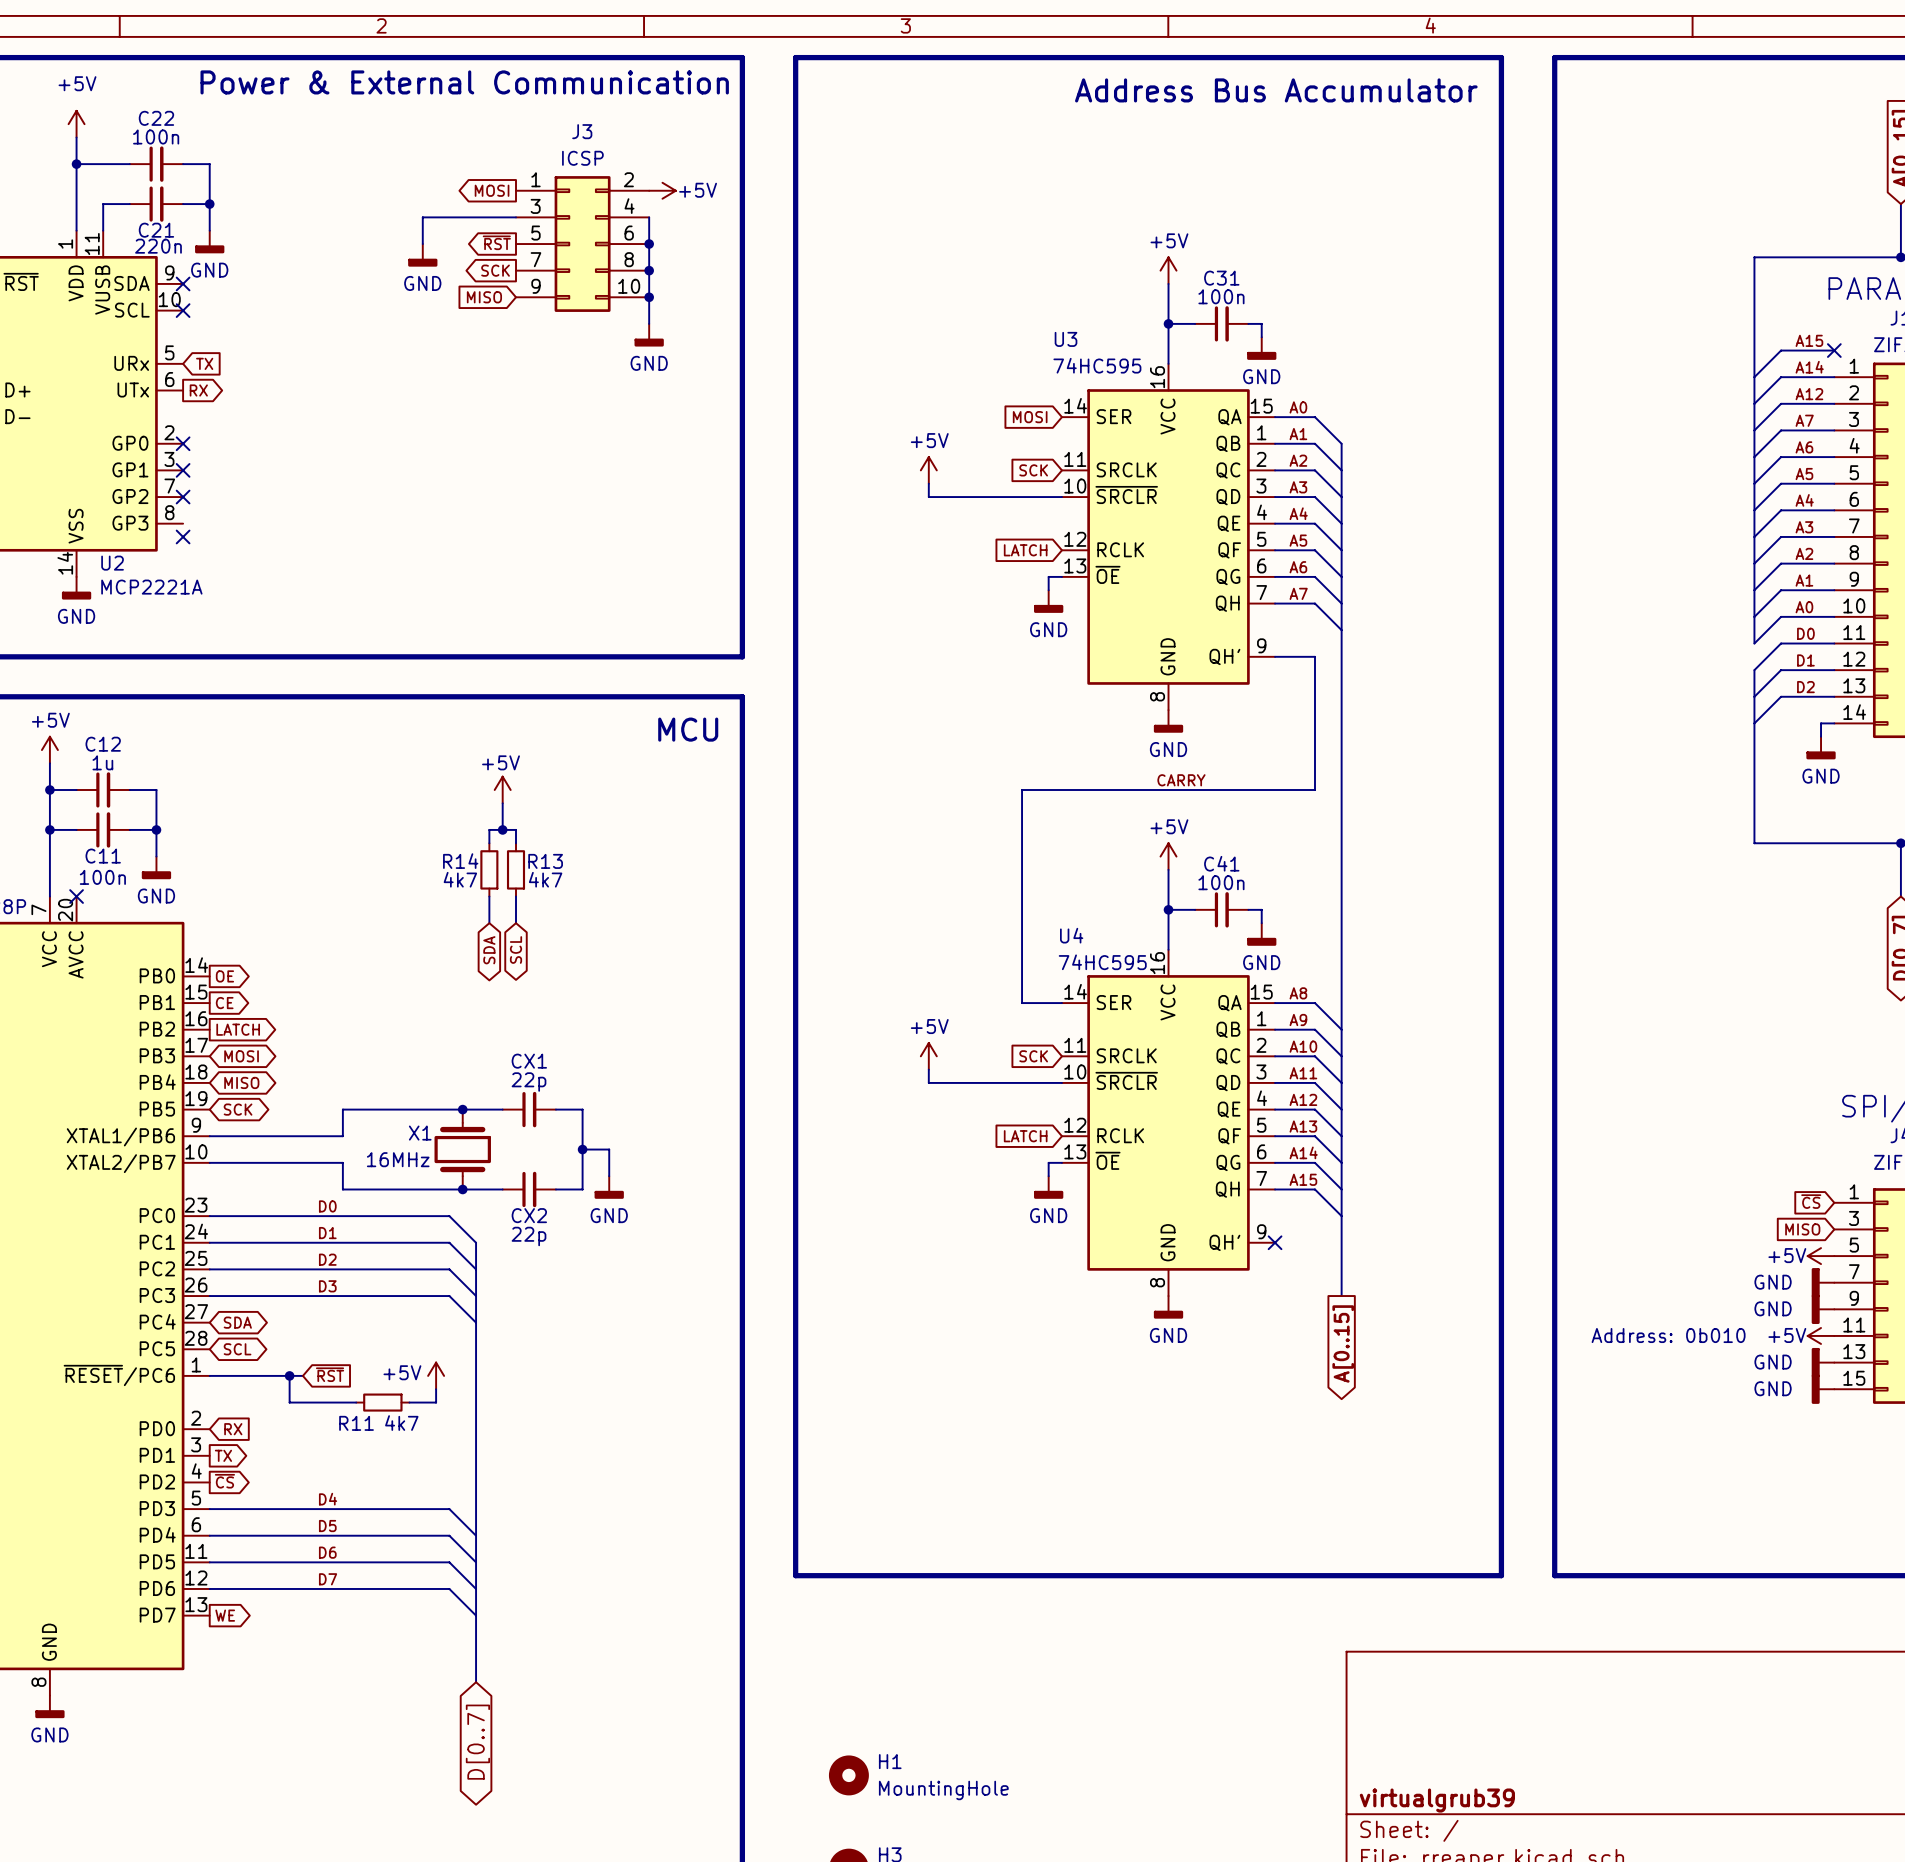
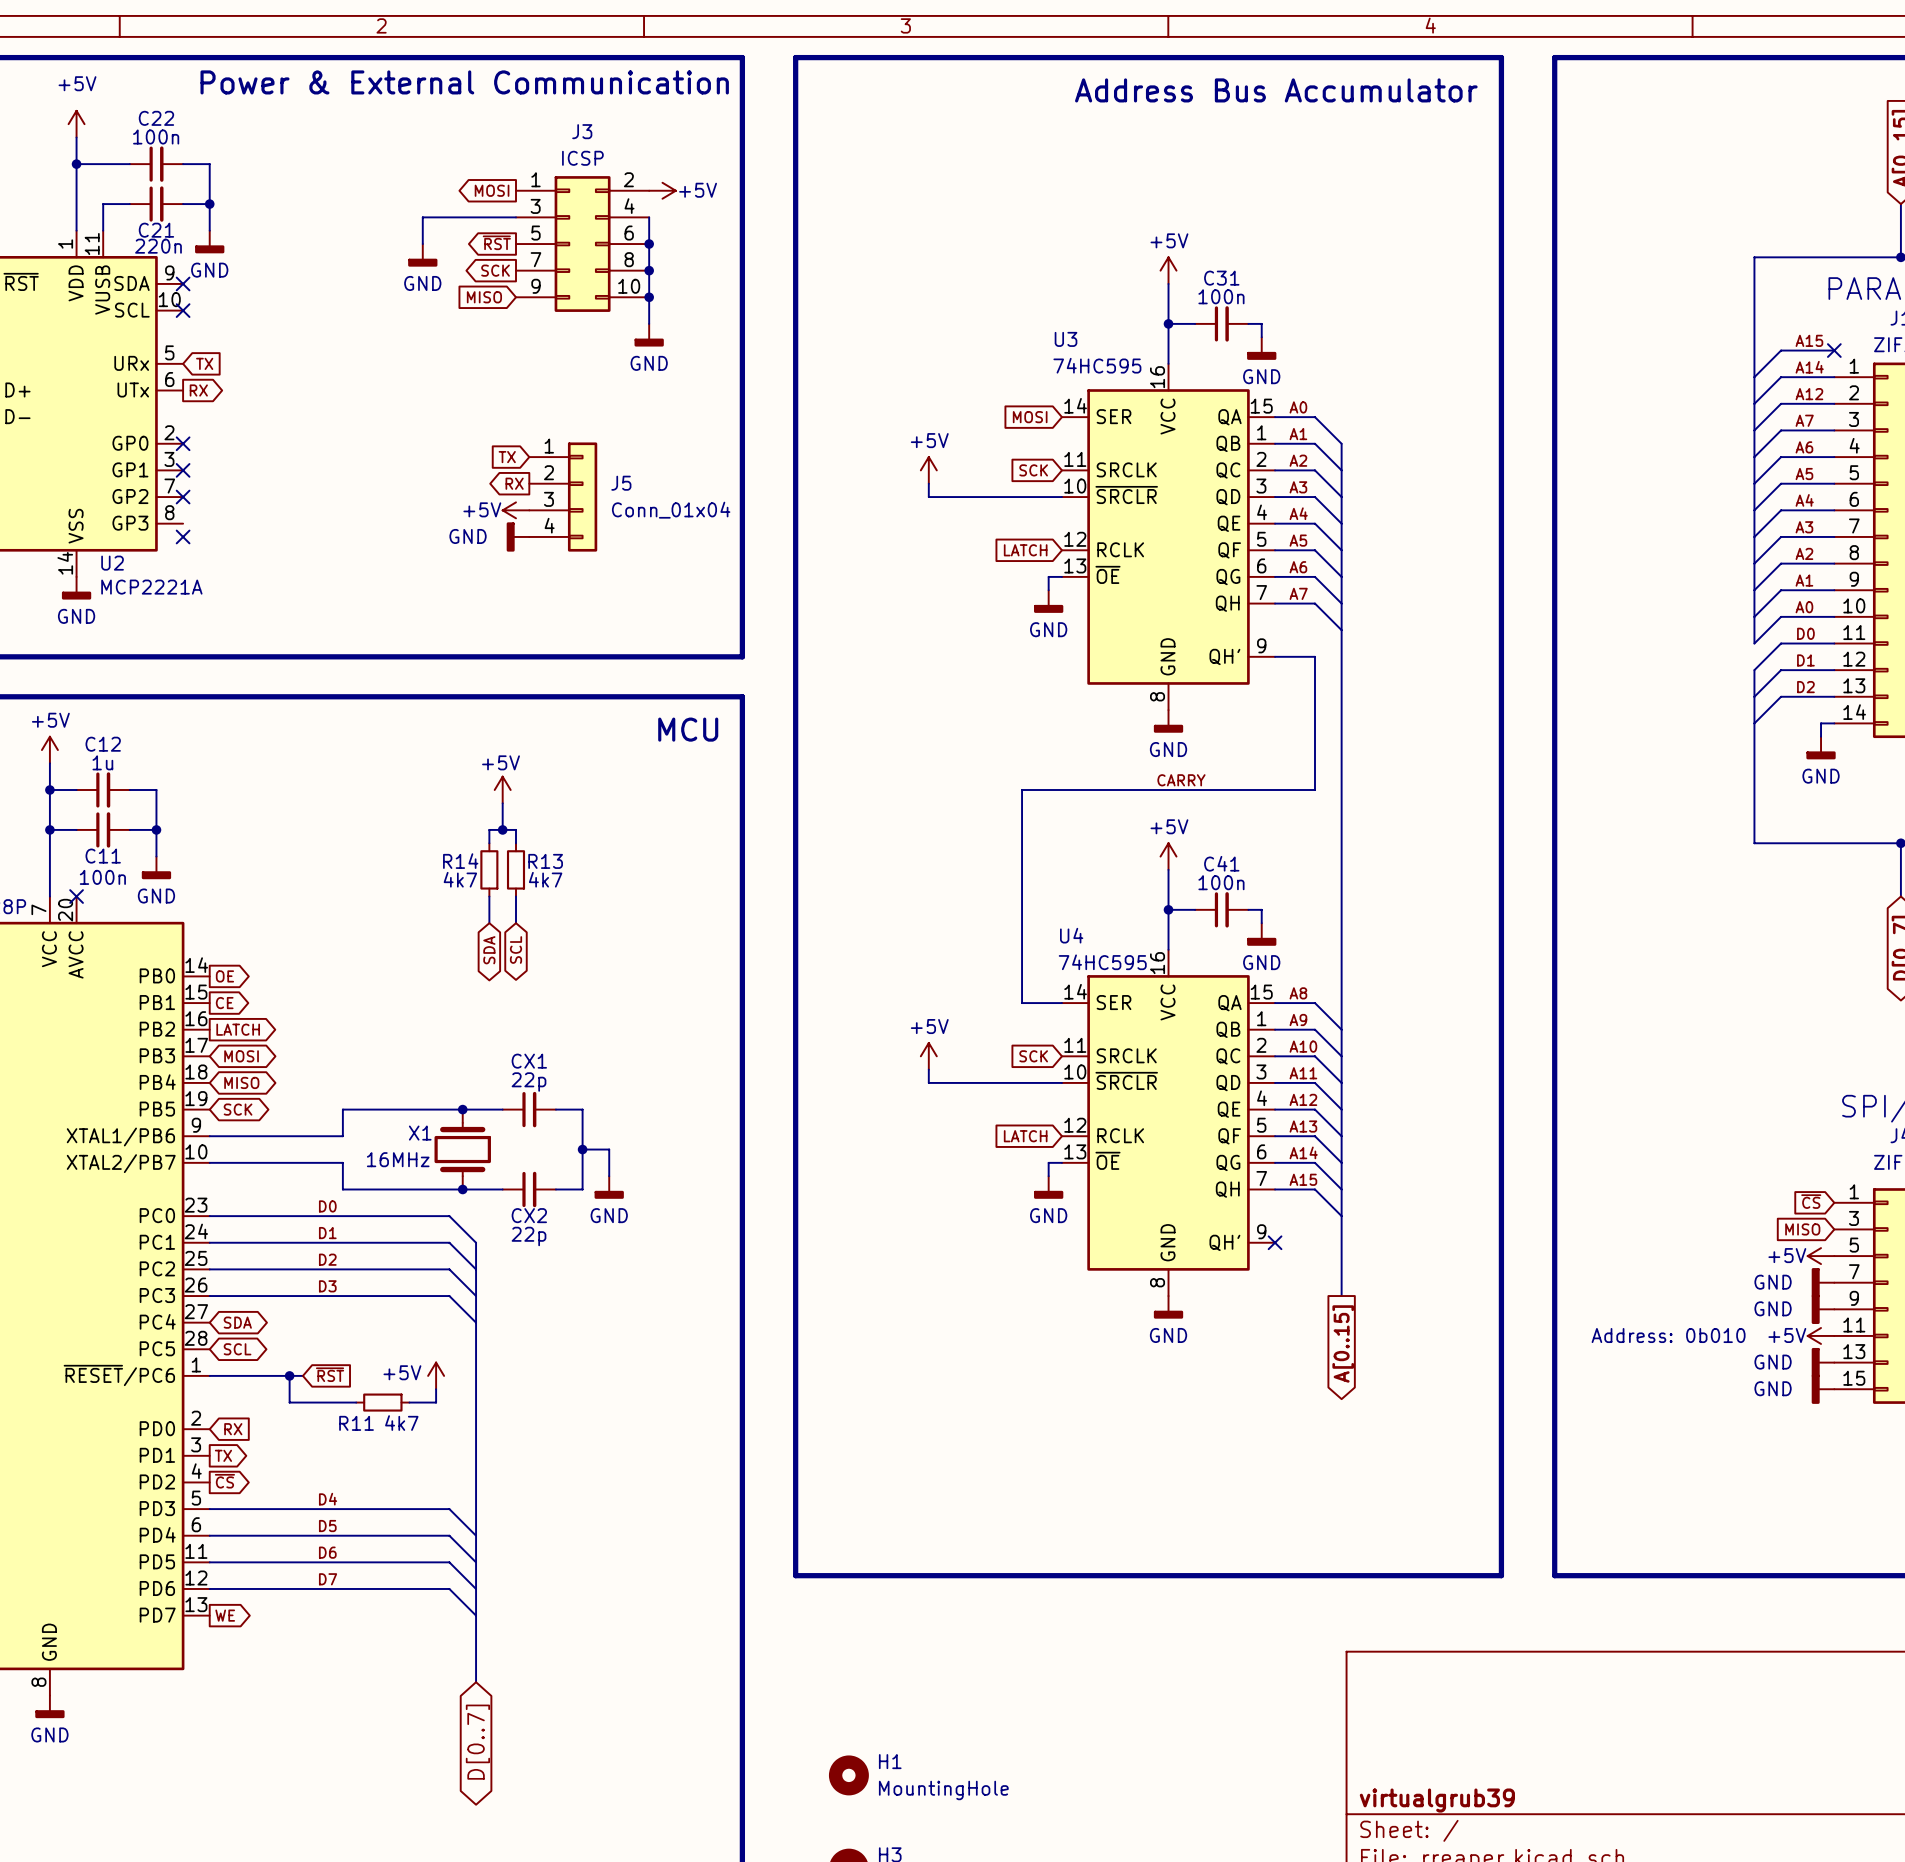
global label: none -> TX (507, 457)
global label: none -> RX (514, 483)
J5: none -> Conn_01x04 (563, 497)
power symbol: none -> +5V (516, 510)
power symbol: none -> GND (518, 536)

